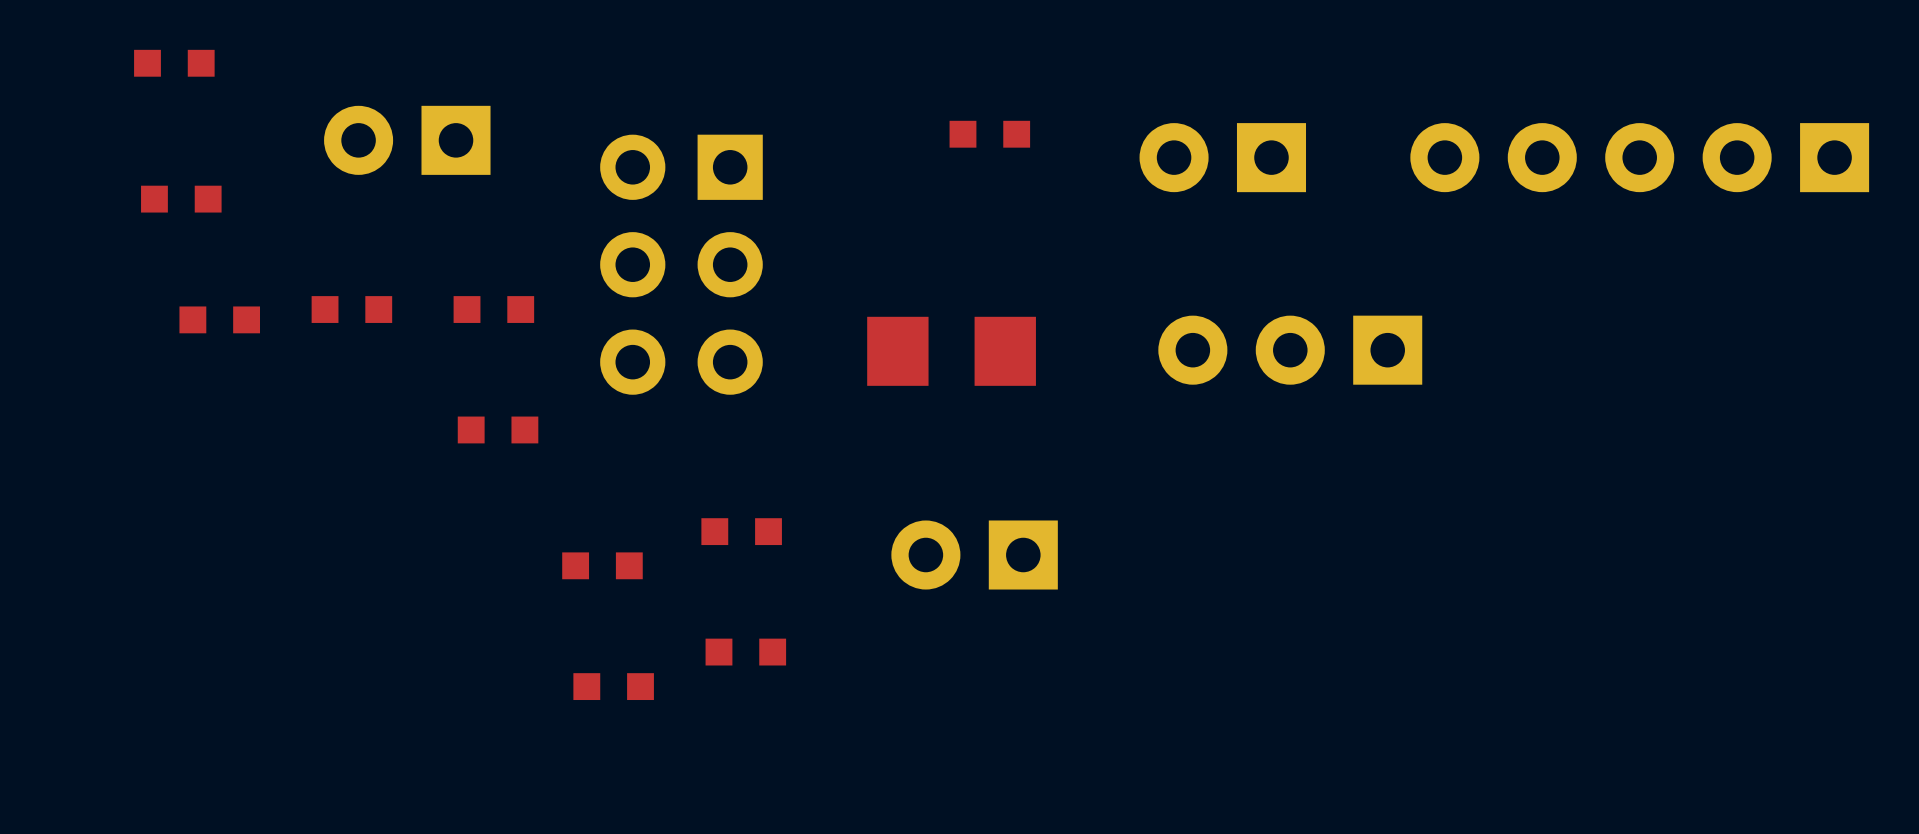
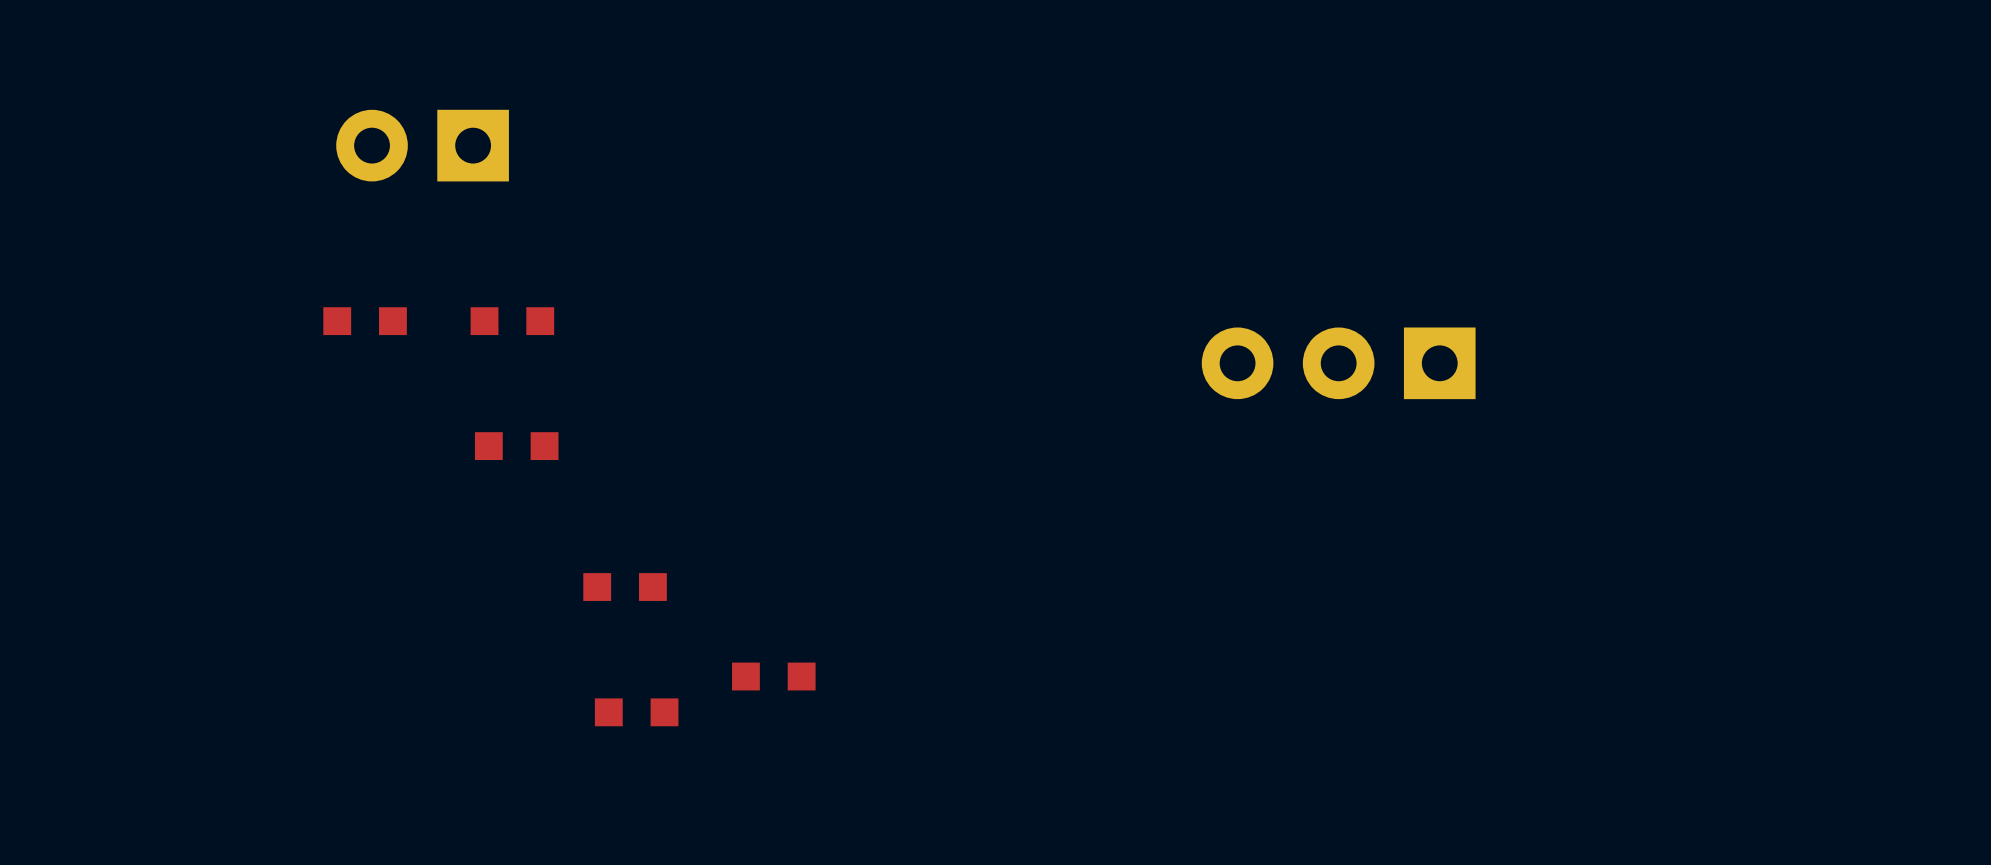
part: (174, 63) -> none
part: (989, 134) -> none
part: (1222, 157) -> none
part: (1639, 157) -> none
part: (181, 199) -> none
part: (681, 264) -> none
part: (219, 319) -> none
part: (951, 351) -> none
part: (741, 531) -> none
part: (974, 555) -> none

